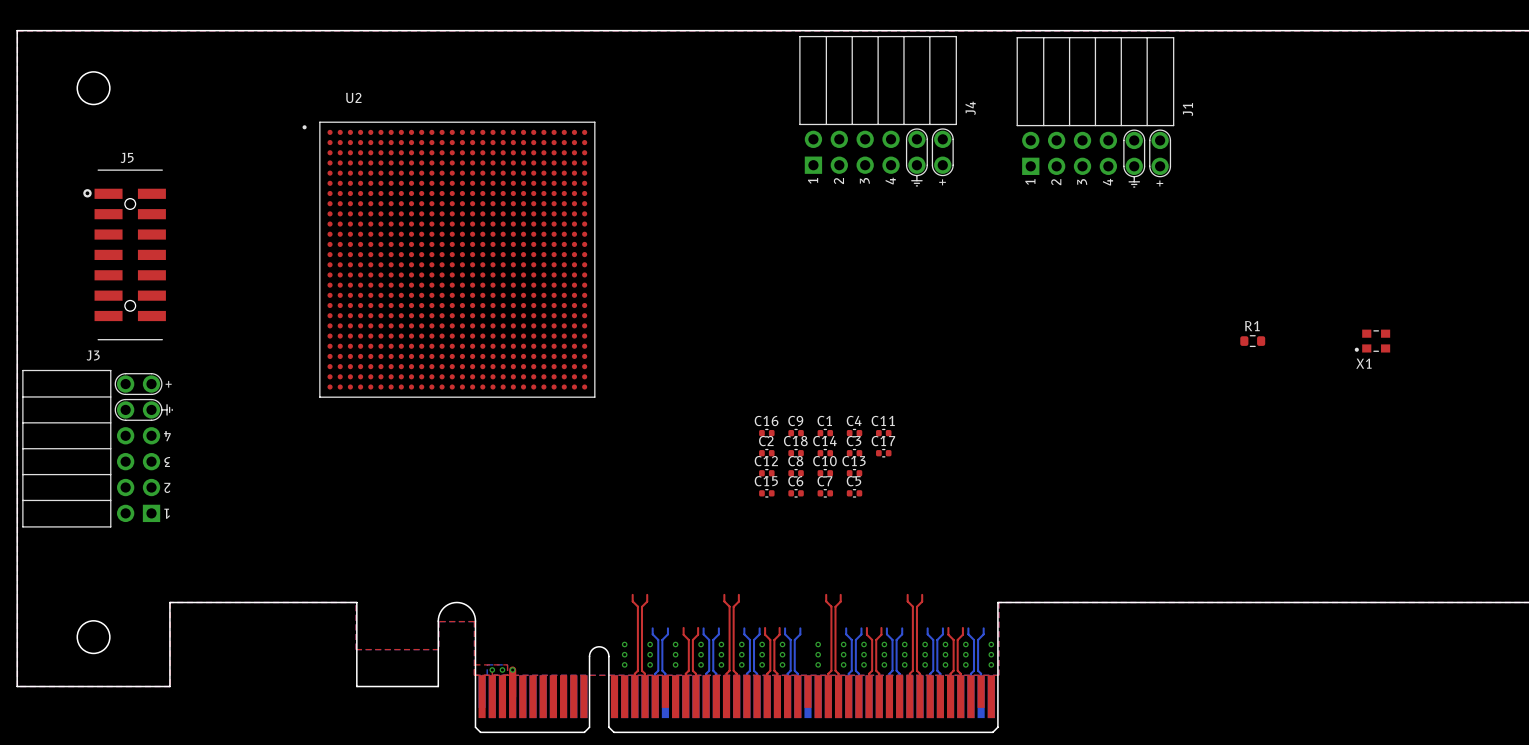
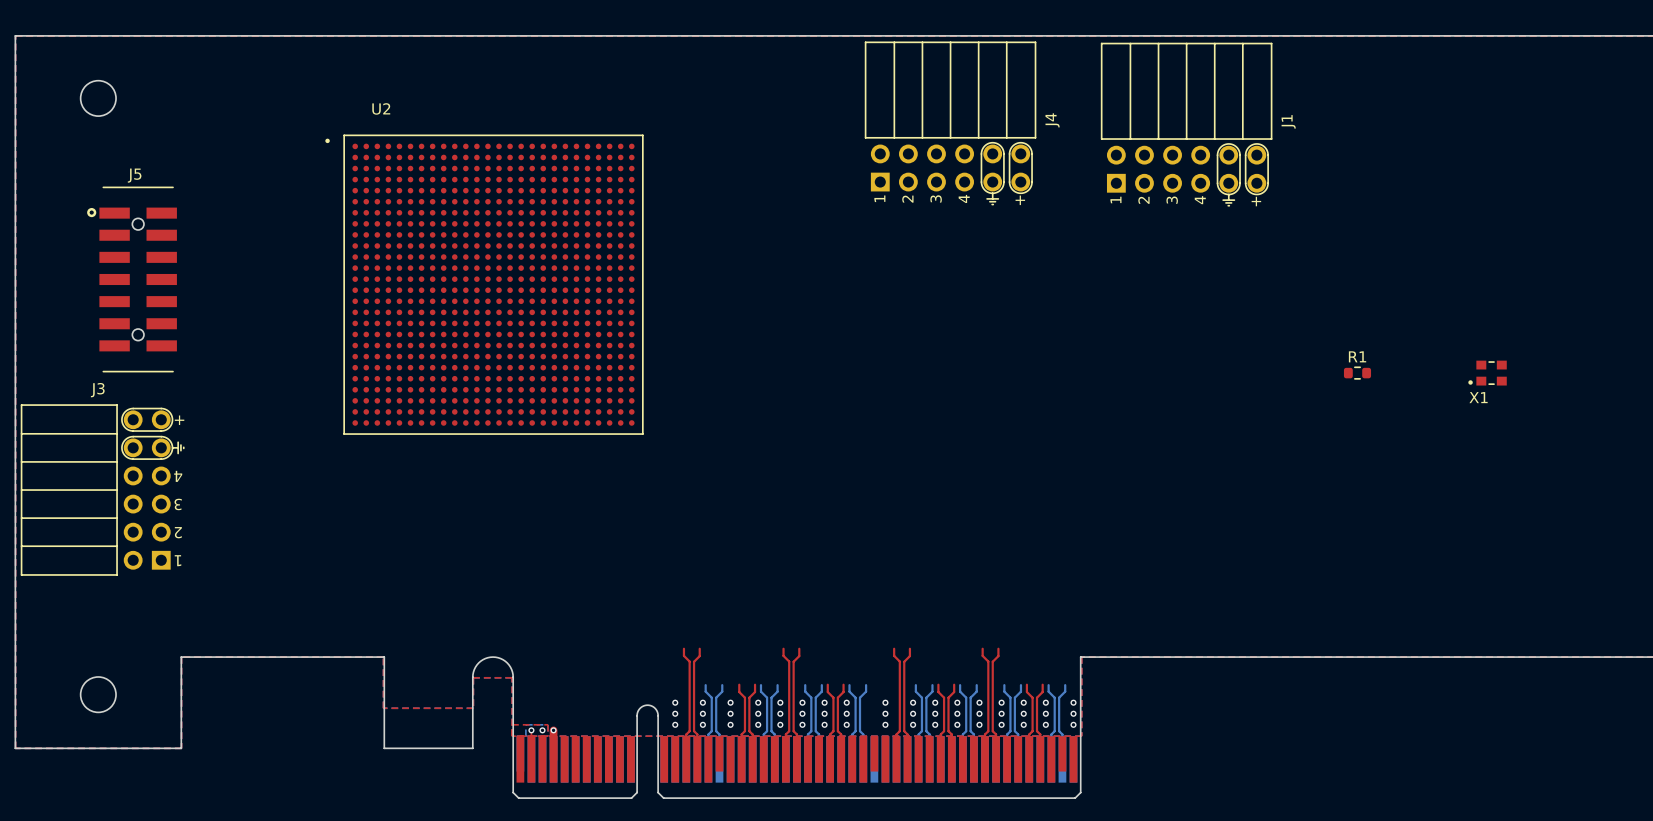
C16: (766, 433) -> none
C9: (796, 433) -> none
C1: (825, 433) -> none
C4: (854, 433) -> none
C11: (883, 433) -> none
C2: (766, 453) -> none
C18: (796, 453) -> none
C14: (825, 453) -> none
C3: (854, 453) -> none
C17: (883, 453) -> none
C12: (766, 473) -> none
C8: (796, 473) -> none
C10: (825, 473) -> none
C13: (854, 473) -> none
C15: (766, 493) -> none
C6: (796, 493) -> none
C7: (825, 493) -> none
C5: (854, 493) -> none

